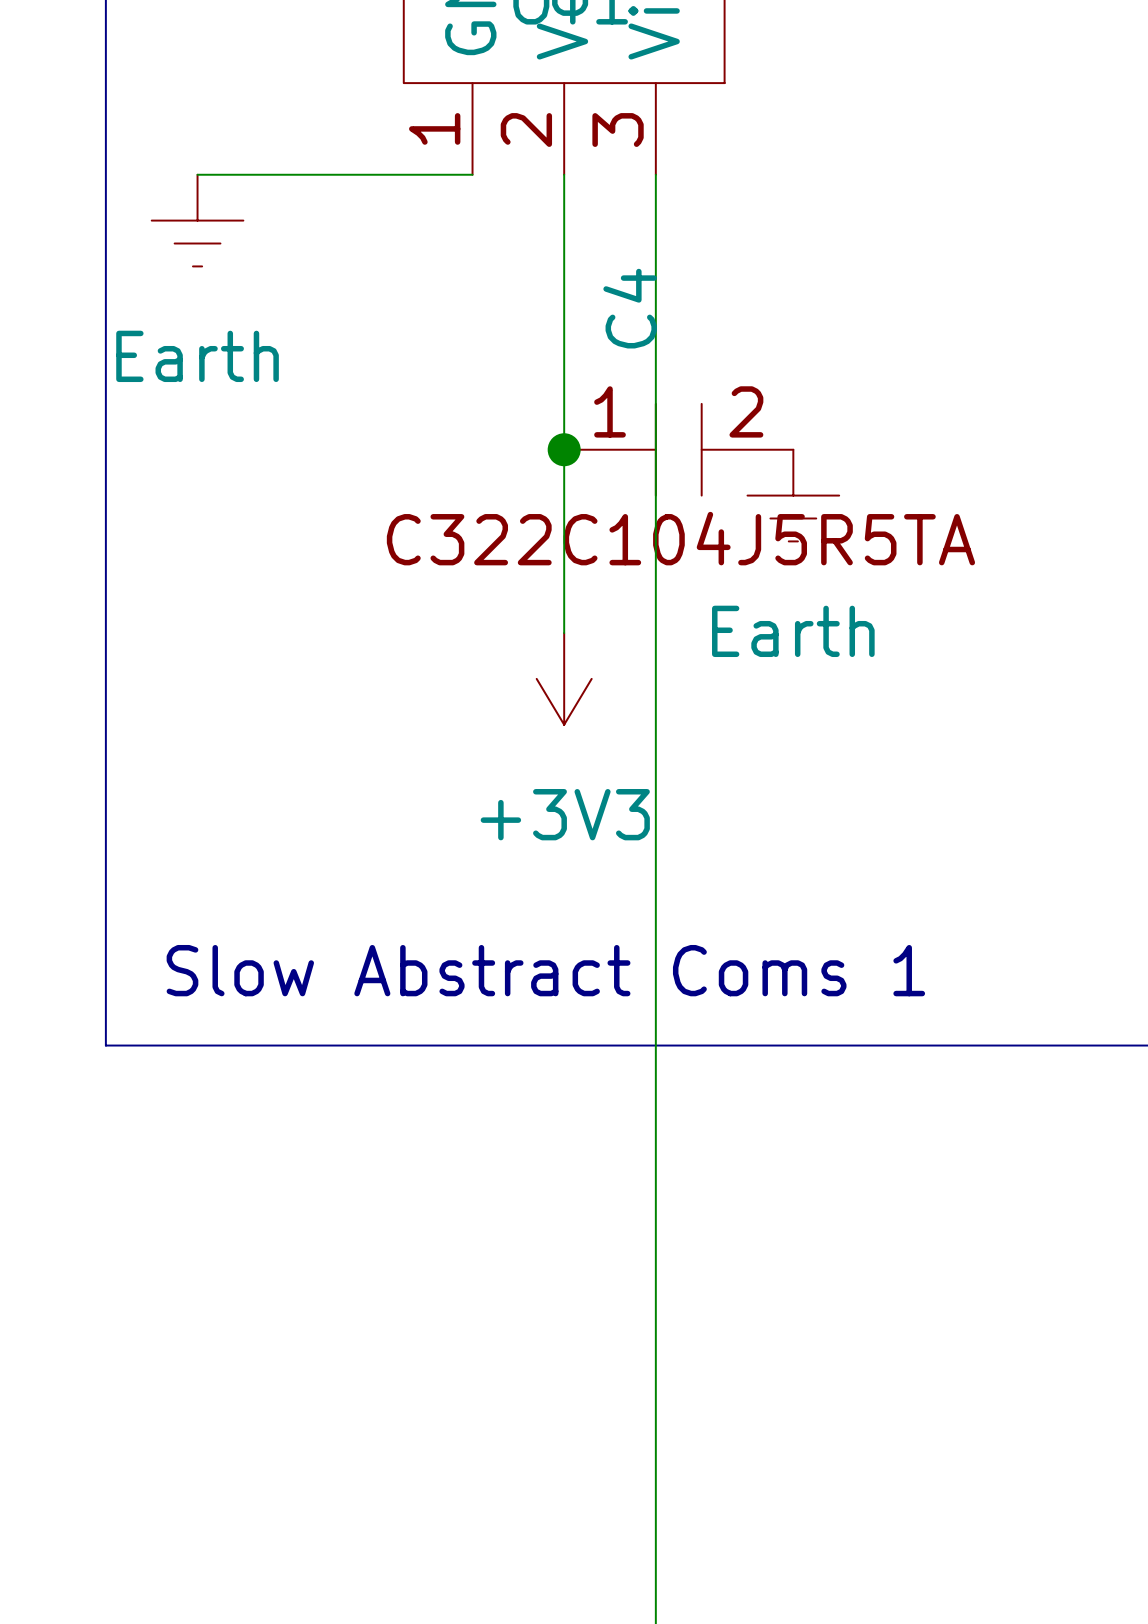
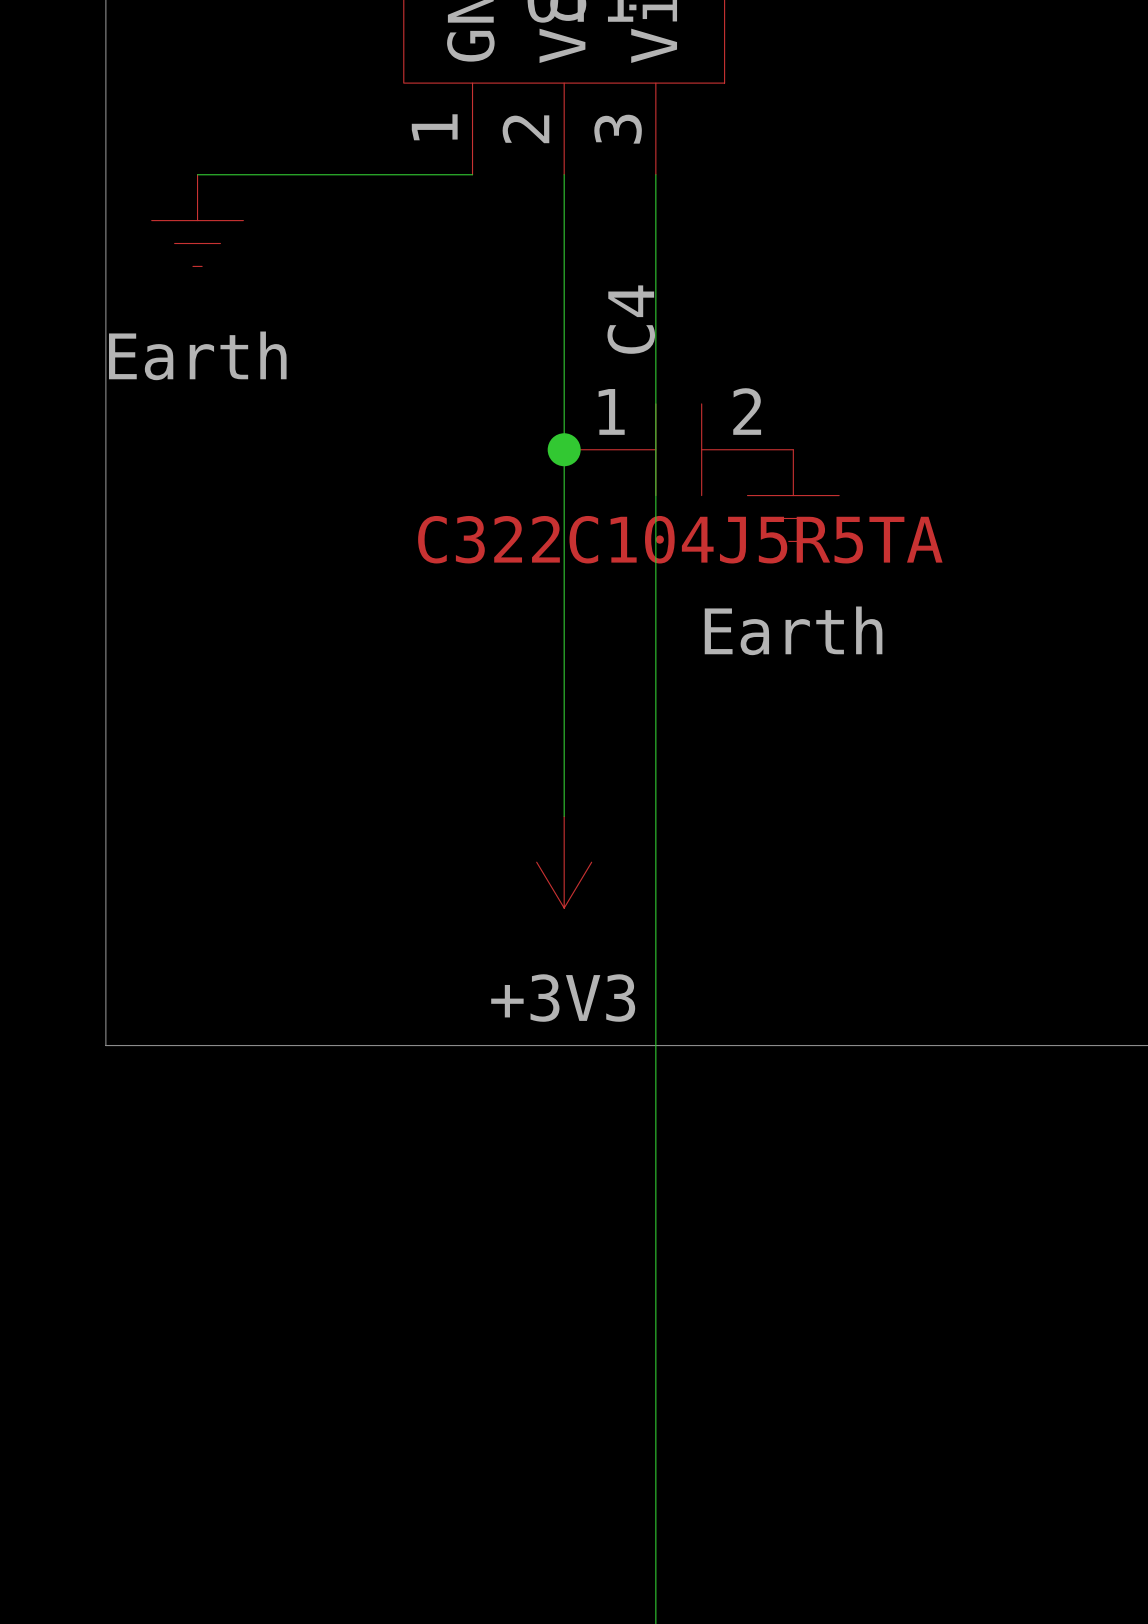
wire: none -> (564, 633) (564, 816)
power symbol position: +3V3 (564, 678) -> +3V3 (564, 862)
text: Slow Abstract Coms 1 (545, 970) -> none

